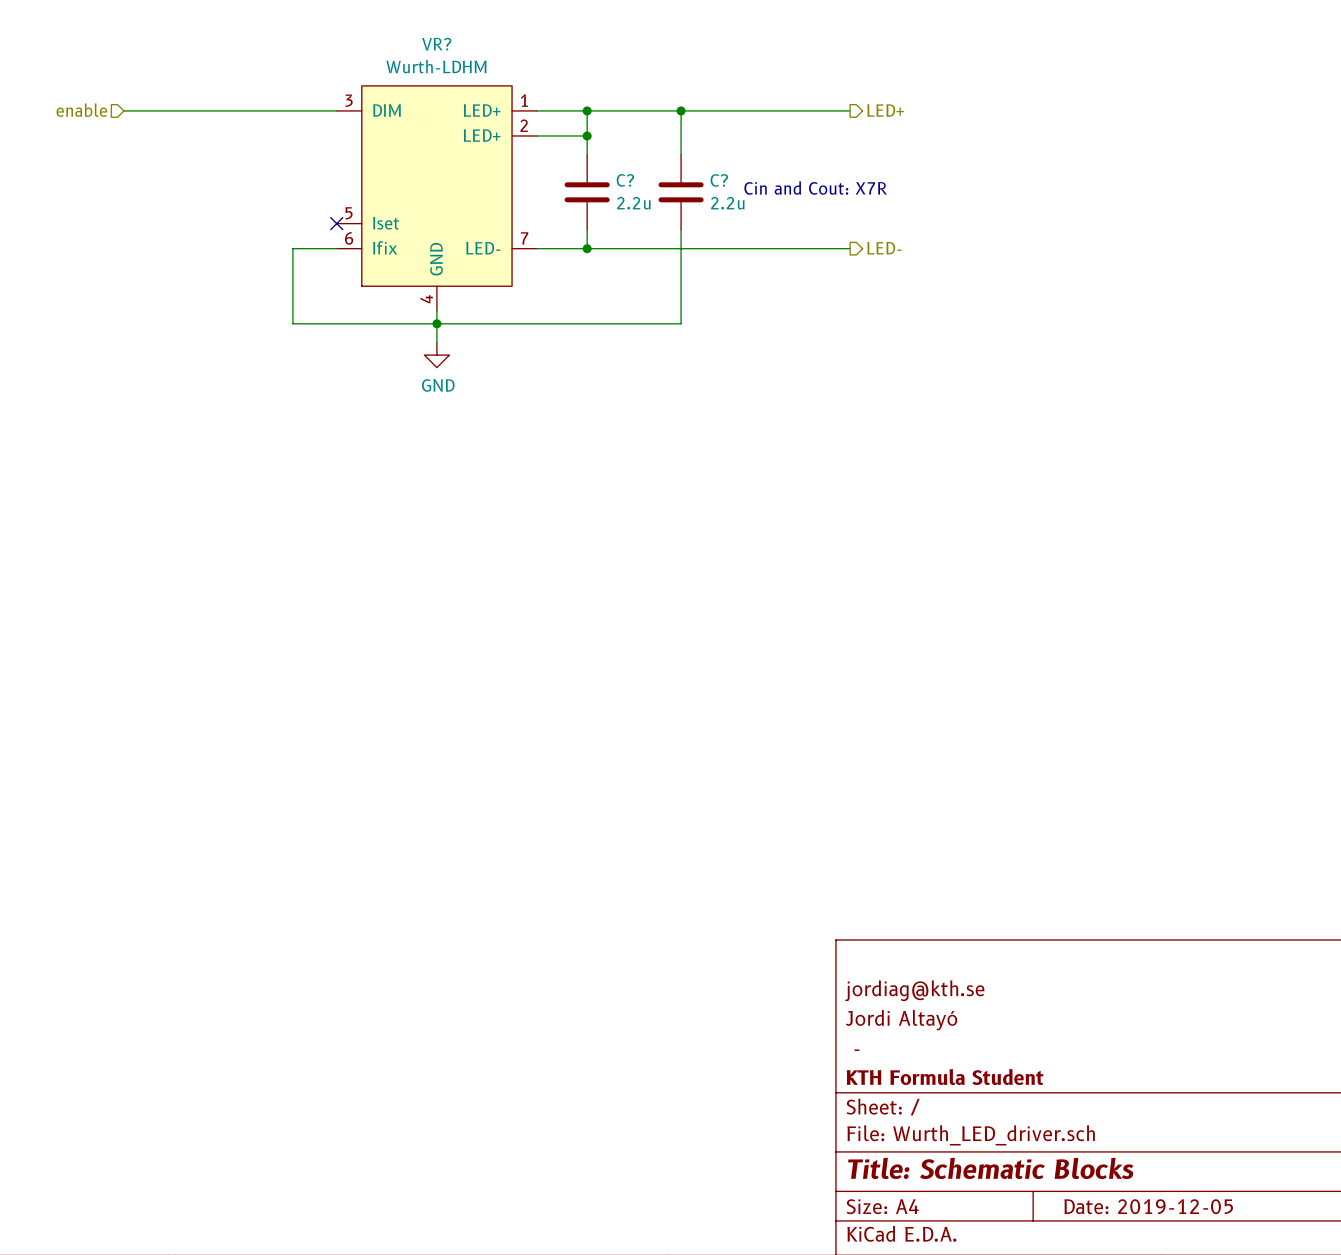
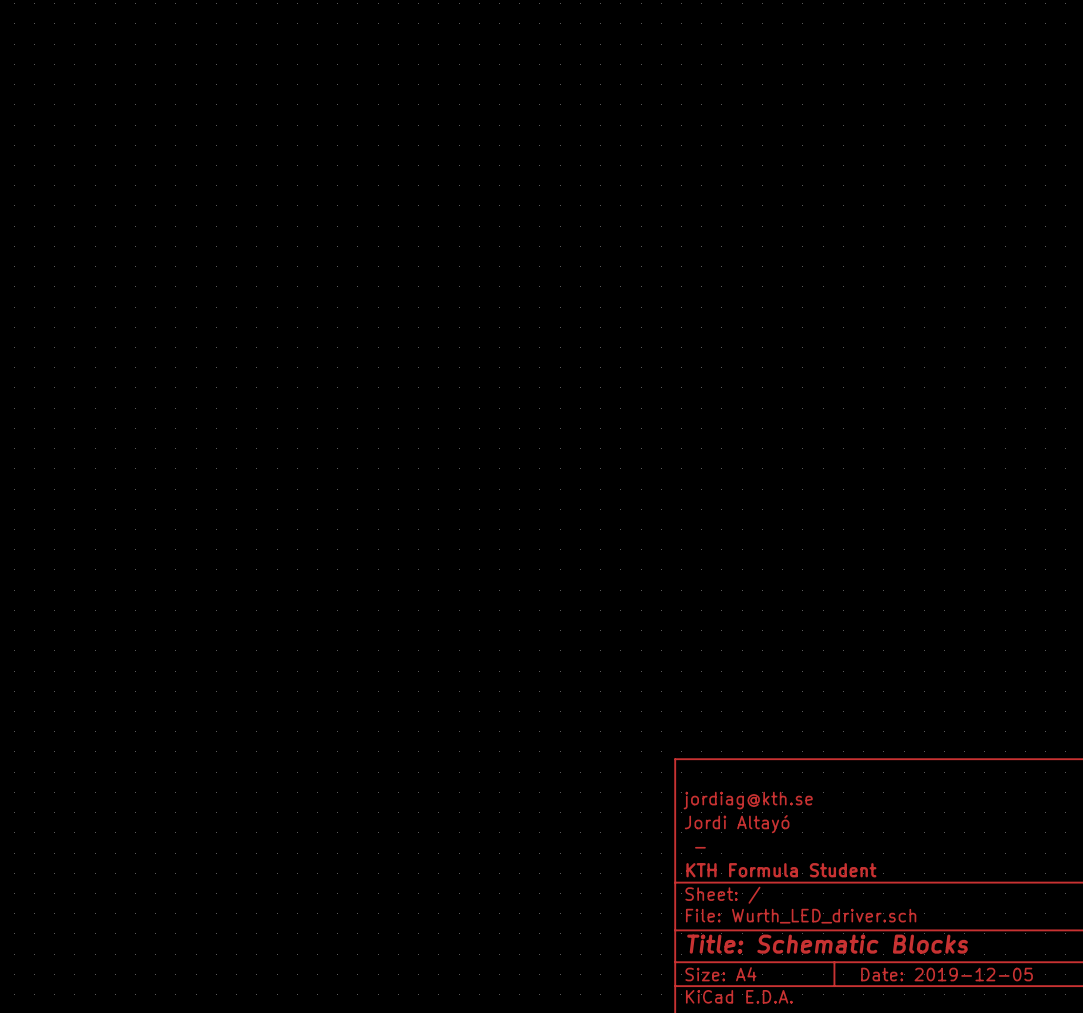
hierarchical label: enable (81, 110) -> none
wire: (123, 110) (336, 110) -> none
wire: (537, 110) (850, 110) -> none
wire: (587, 110) (587, 154) -> none
junction: (587, 110) -> none
wire: (681, 110) (681, 154) -> none
junction: (681, 110) -> none
hierarchical label: LED+ (885, 110) -> none
wire: (537, 135) (587, 135) -> none
junction: (587, 135) -> none
text: Cin and Cout: X7R (815, 187) -> none
C?: 2.2u (587, 192) -> none
C?: 2.2u (681, 192) -> none
VR?: Wurth-LDHM (436, 198) -> none
no-connect mark: (336, 223) -> none
wire: (587, 229) (587, 248) -> none
wire: (681, 229) (681, 323) (292, 323) (292, 248) (336, 248) -> none
wire: (537, 248) (850, 248) -> none
junction: (587, 248) -> none
hierarchical label: LED- (884, 248) -> none
wire: (436, 311) (436, 342) -> none
junction: (436, 323) -> none
power symbol: GND (436, 355) -> none

